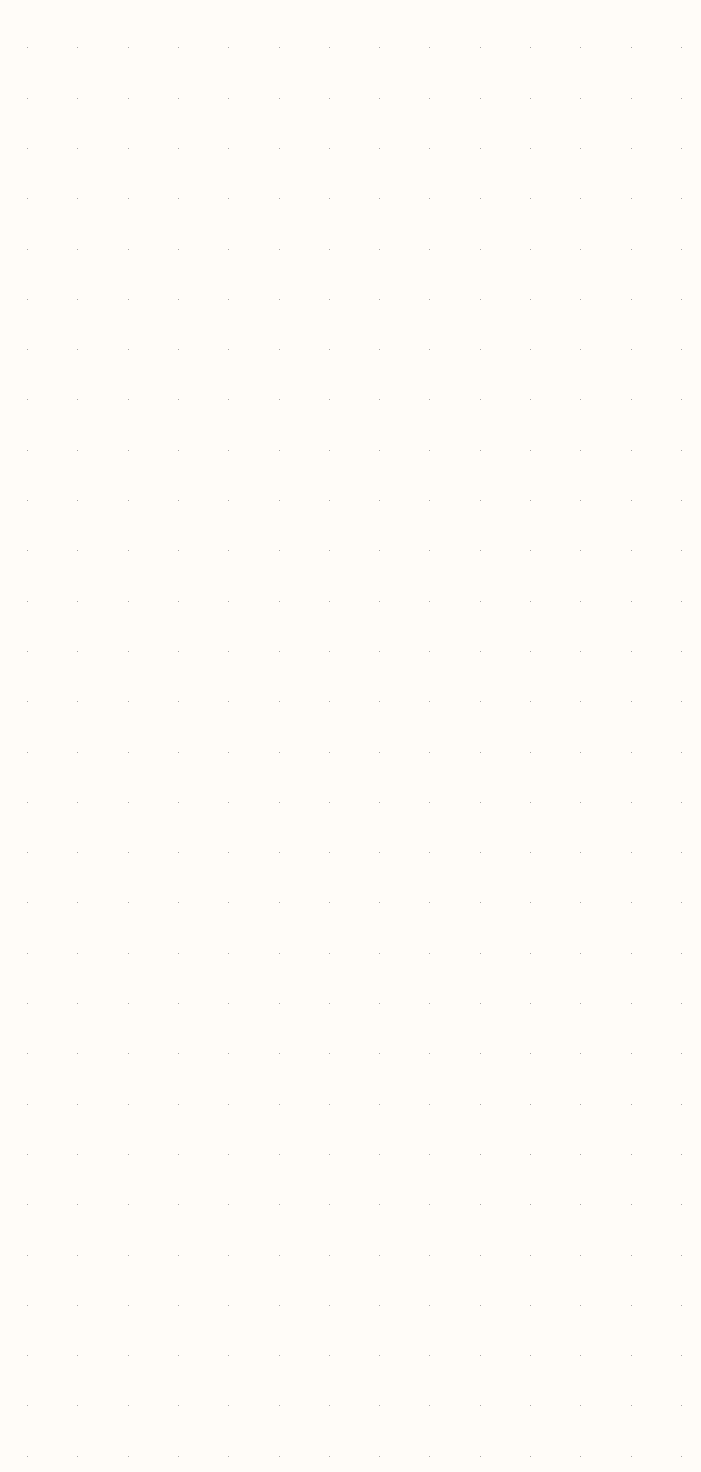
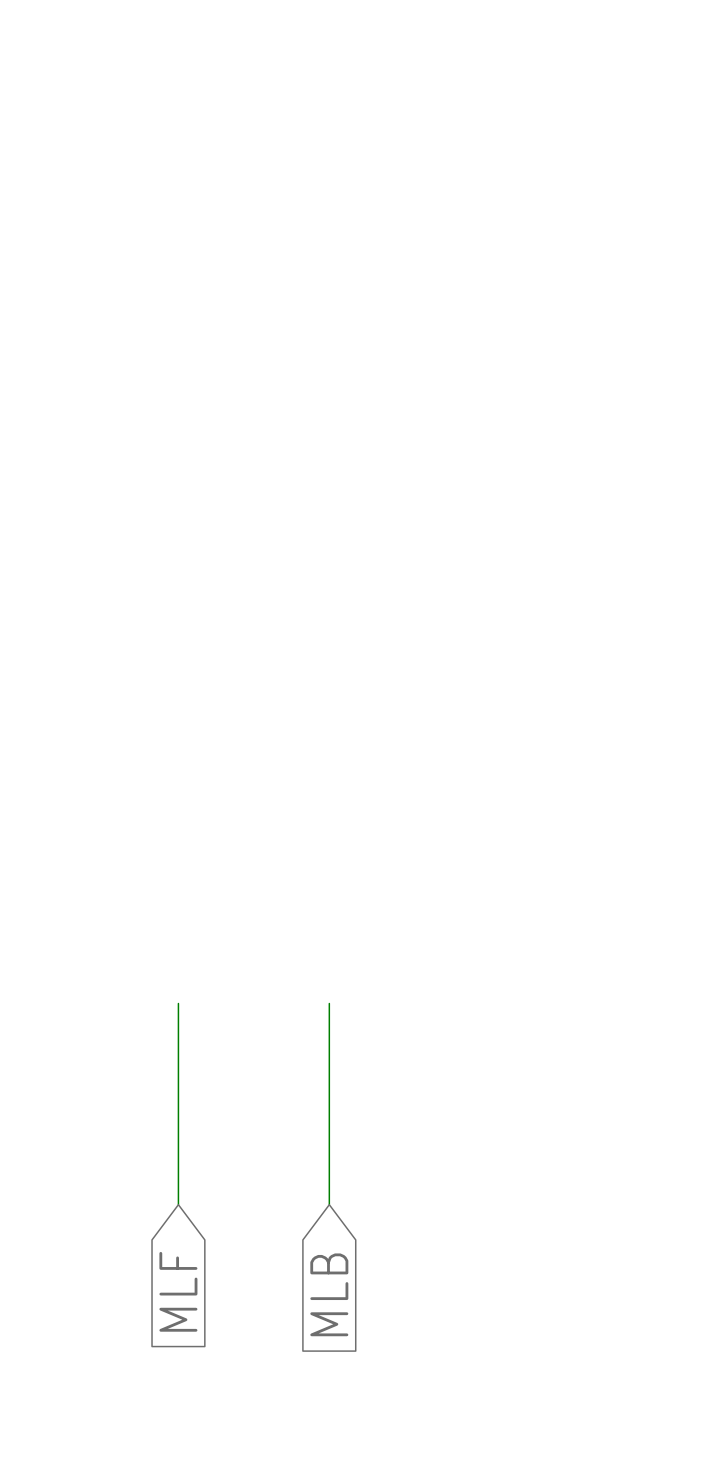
wire: none -> (178, 1003) (178, 1204)
wire: none -> (329, 1003) (329, 1204)
global label: none -> MLF (178, 1291)
global label: none -> MLB (329, 1294)

